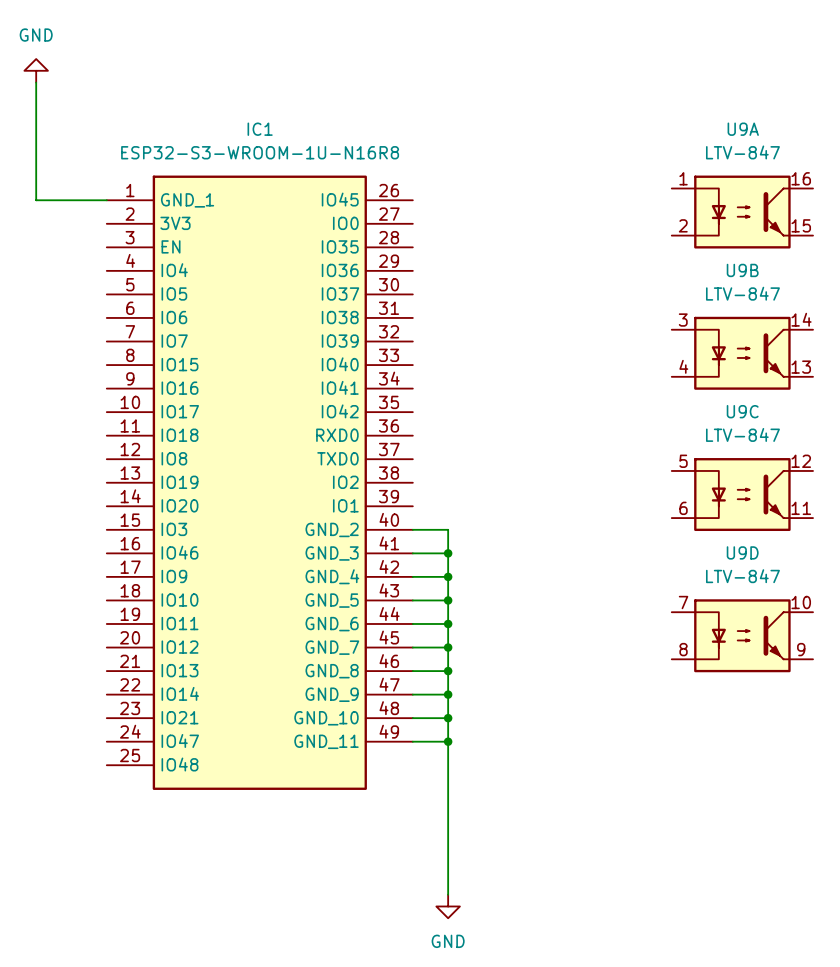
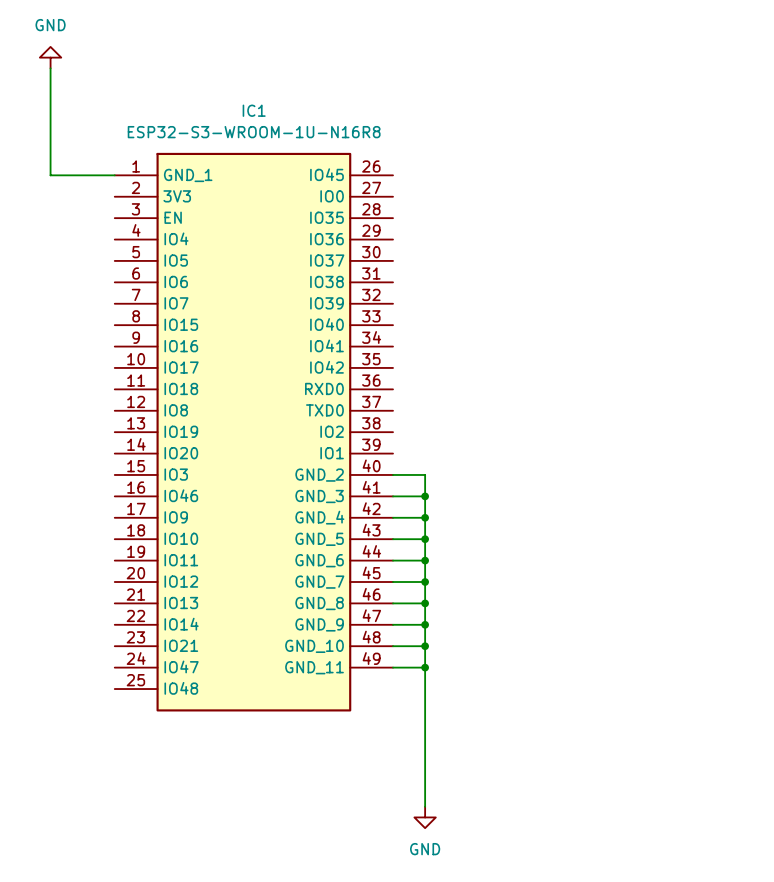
U9A: LTV-847 (742, 212) -> none
U9B: LTV-847 (742, 353) -> none
U9C: LTV-847 (742, 494) -> none
U9D: LTV-847 (742, 635) -> none

